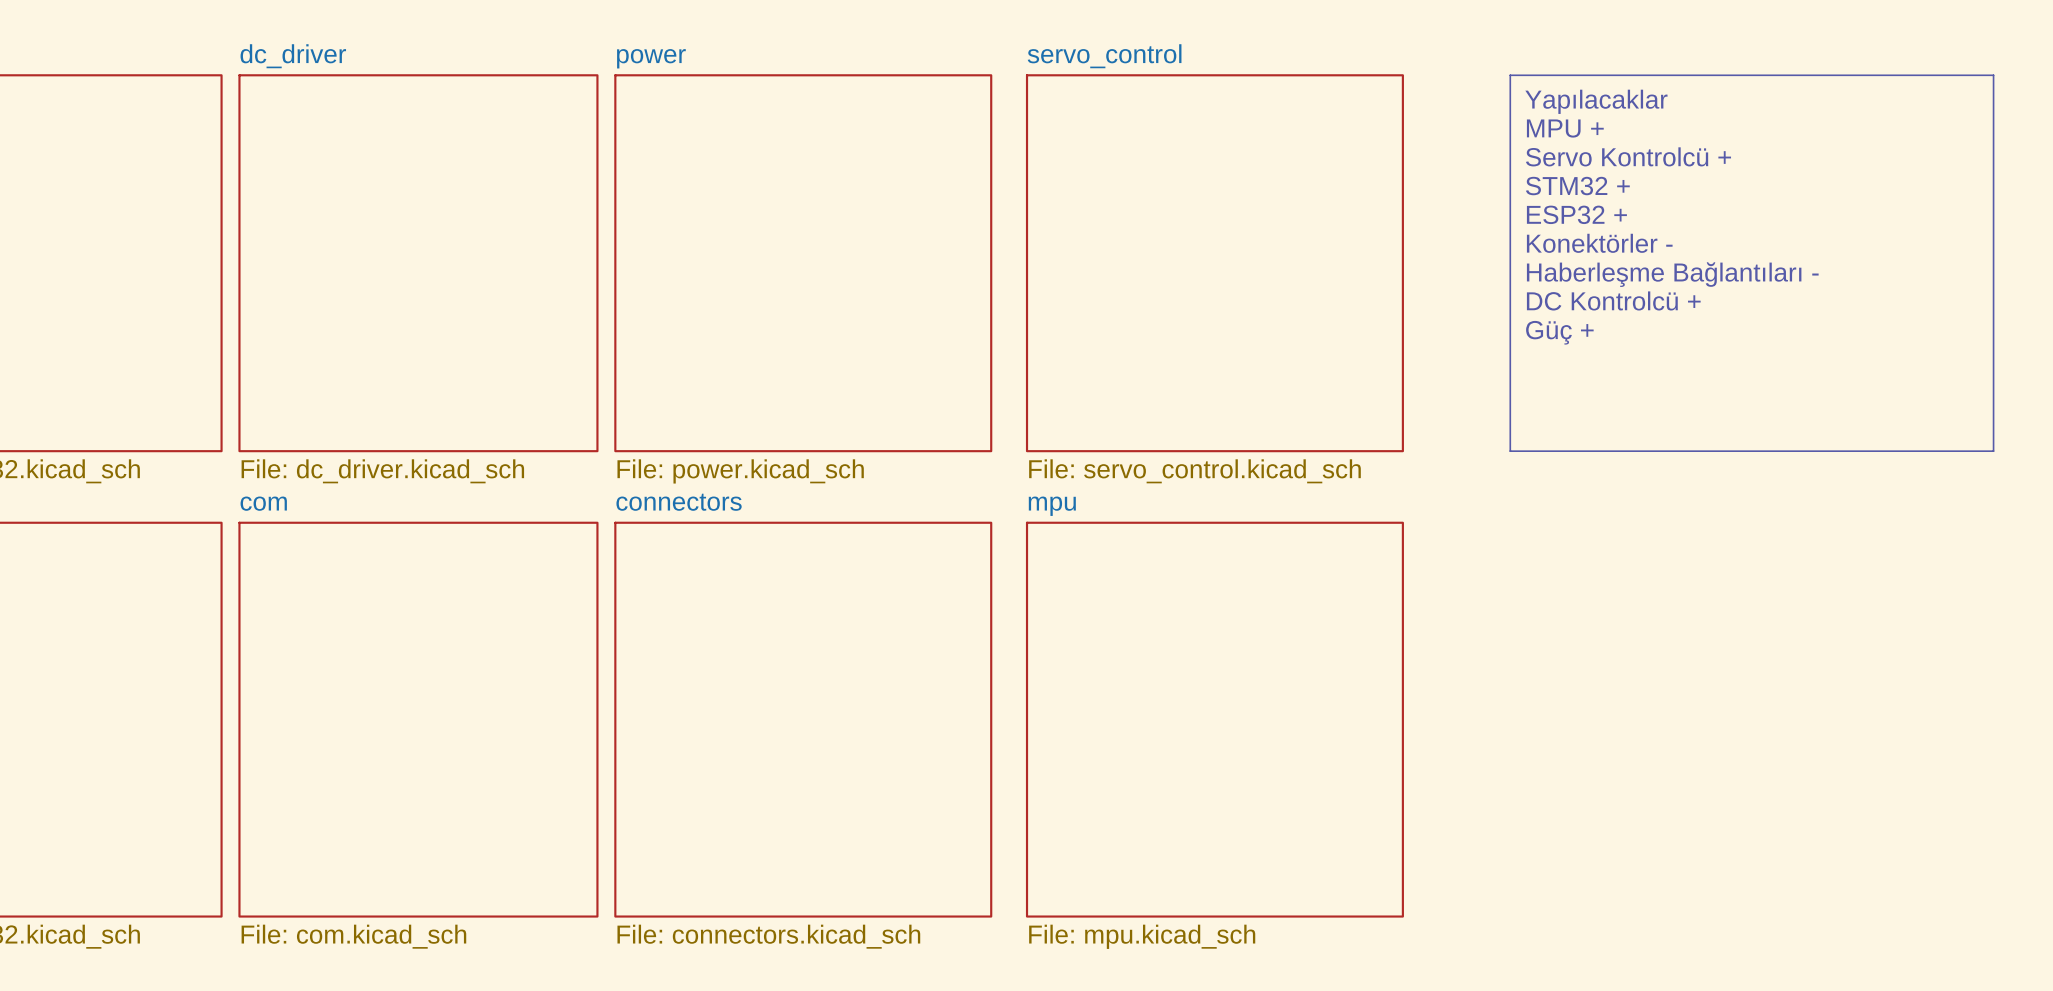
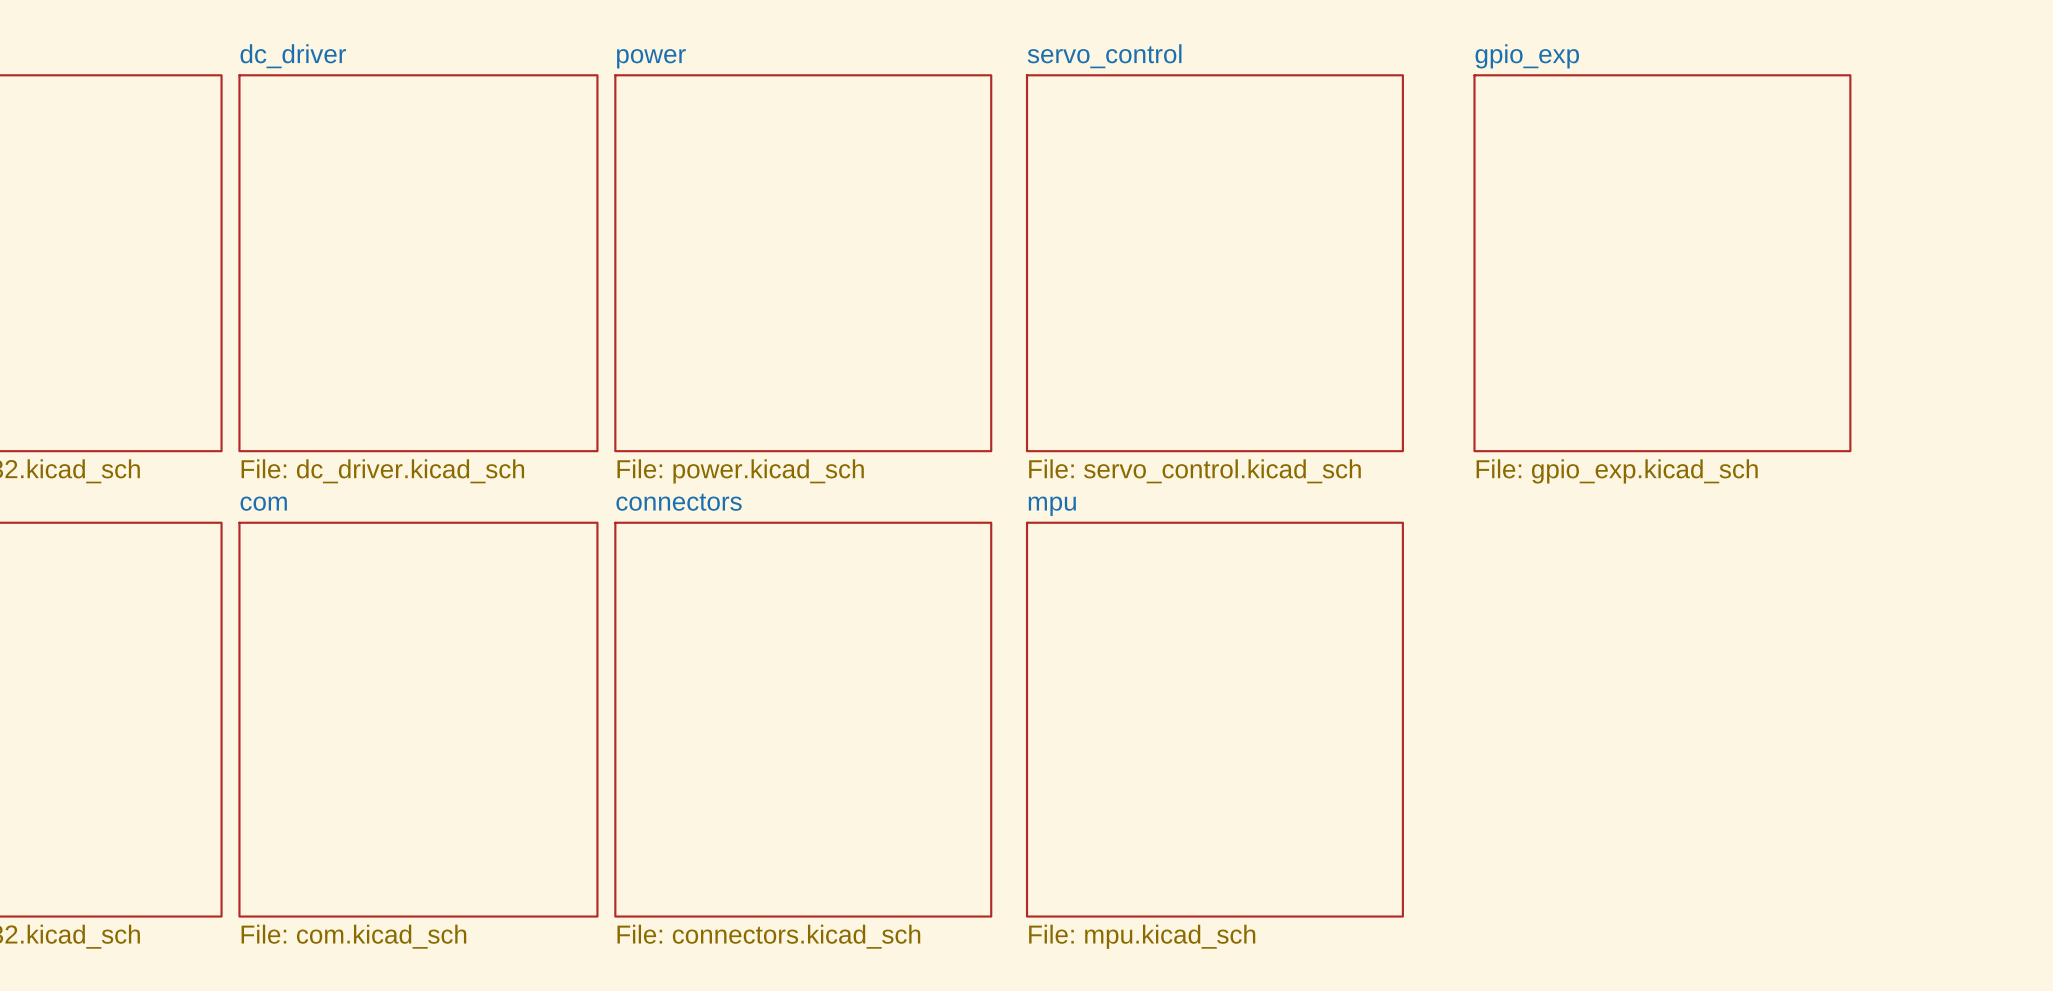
line: (1510, 75) (1993, 75) (1993, 451) (1510, 451) (1510, 75) -> none
text: Yapılacaklar (1596, 101) -> none
text: MPU + (1565, 128) -> none
text: Servo Kontrolcü + (1628, 156) -> none
text: STM32 + (1577, 186) -> none
text: ESP32 + (1576, 214) -> none
text: Konektörler - (1599, 243) -> none
sheet gpio_exp: none -> File: gpio_exp.kicad_sch (1662, 263)
text: Haberleşme Bağlantıları - (1672, 274) -> none
text: DC Kontrolcü + (1613, 300) -> none
text: Güç + (1559, 332) -> none

